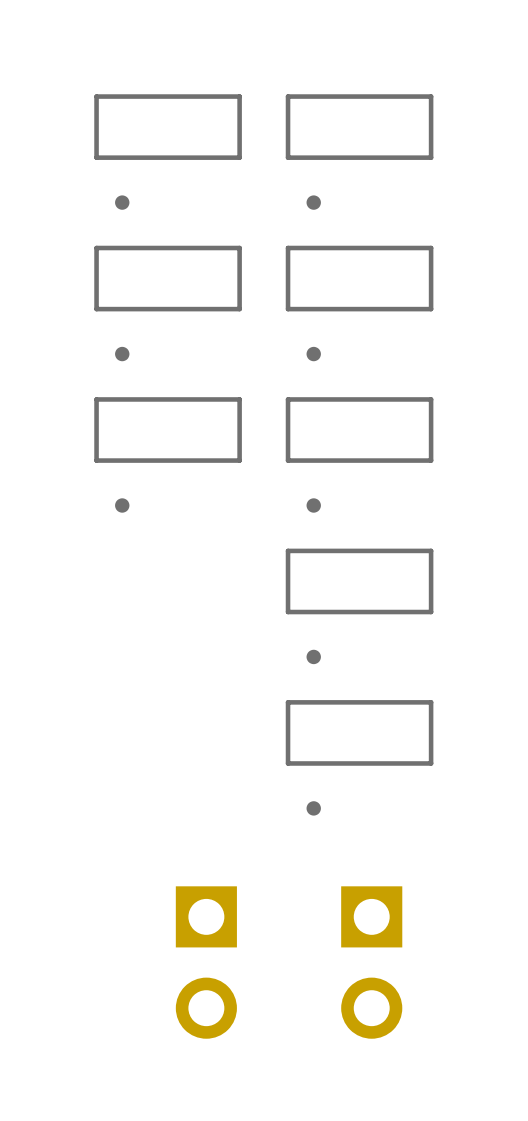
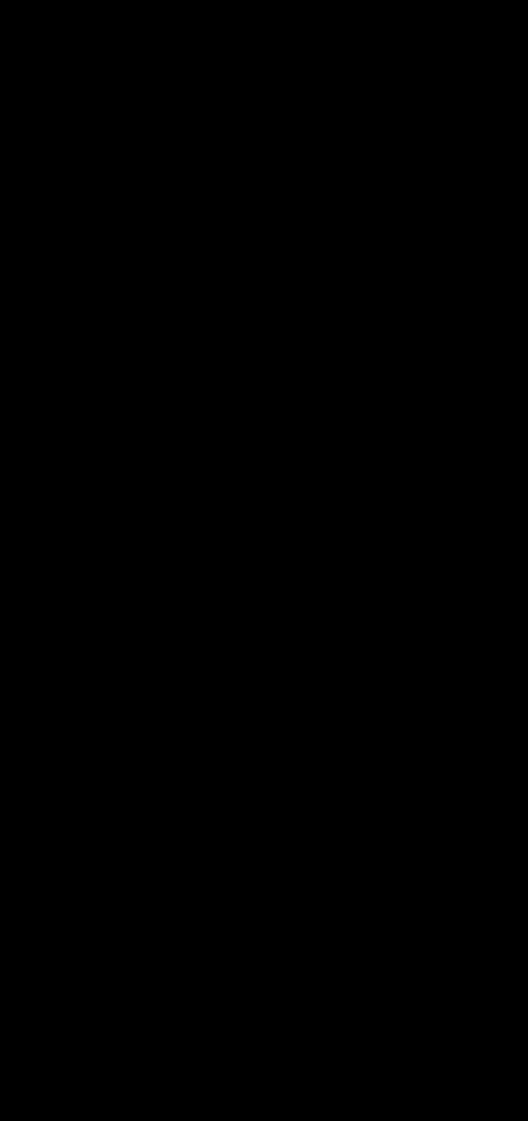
part: (168, 152) -> none
part: (359, 152) -> none
part: (168, 303) -> none
part: (359, 303) -> none
part: (168, 454) -> none
part: (359, 454) -> none
part: (359, 606) -> none
part: (359, 757) -> none
part: (206, 962) -> none
part: (371, 962) -> none

